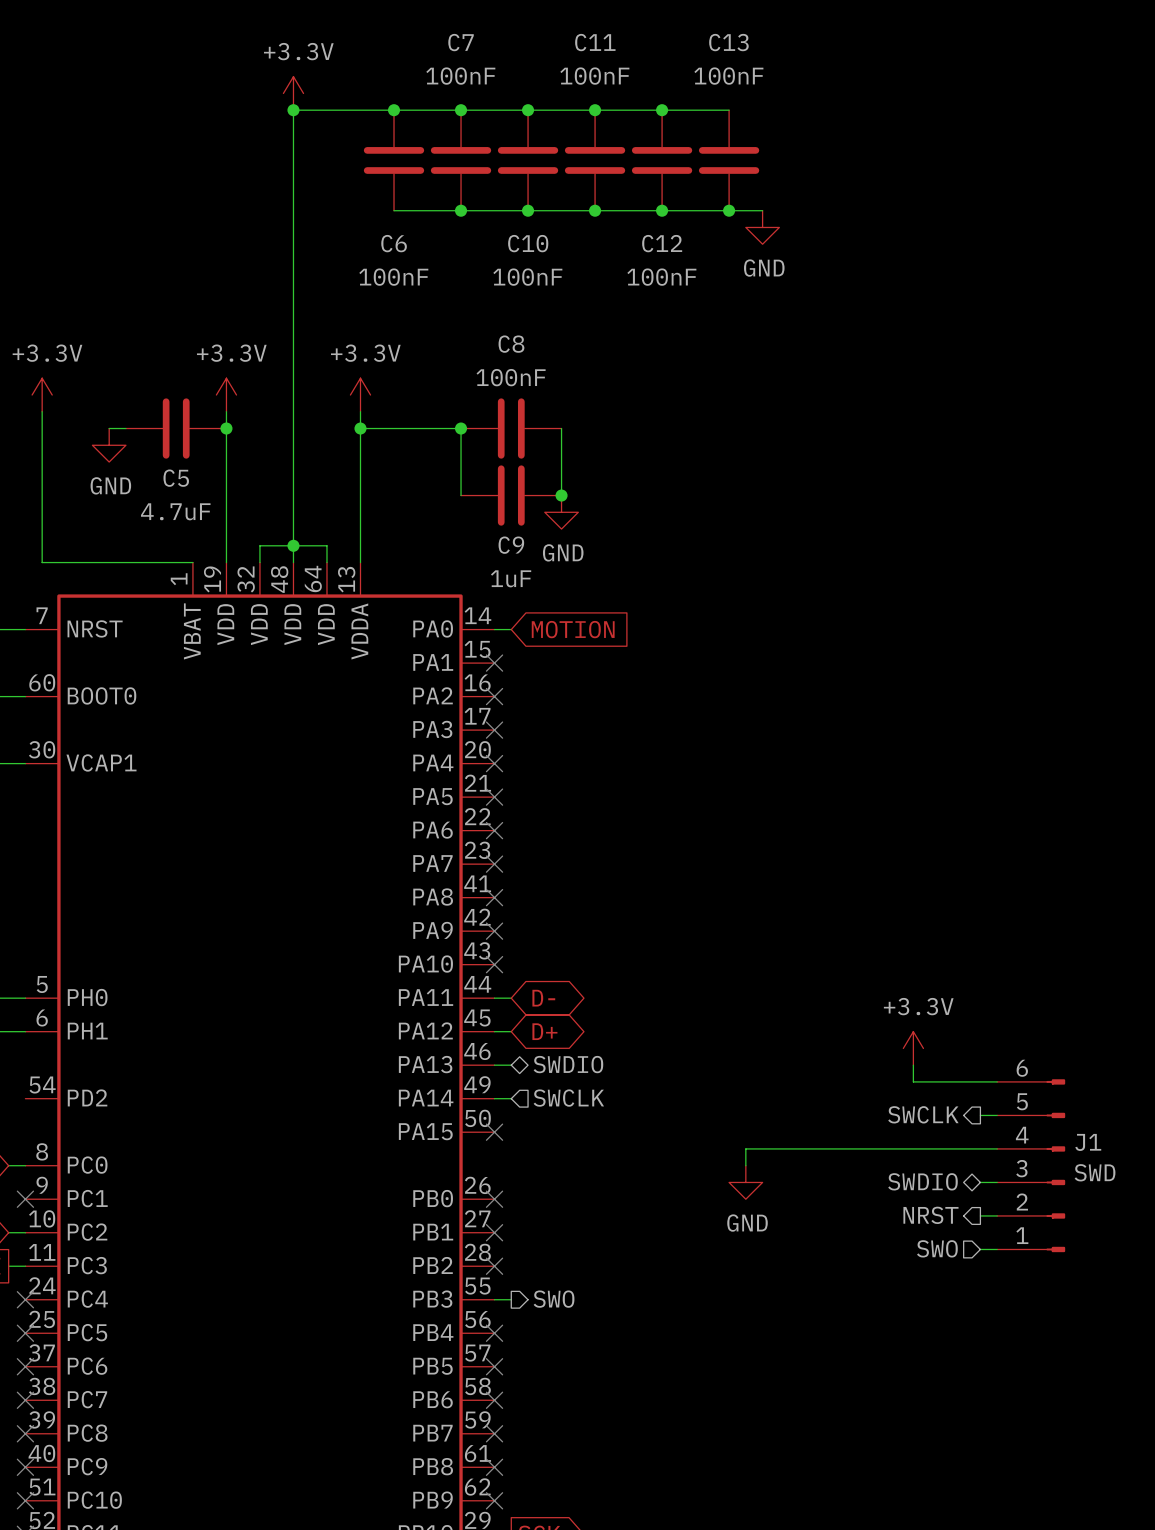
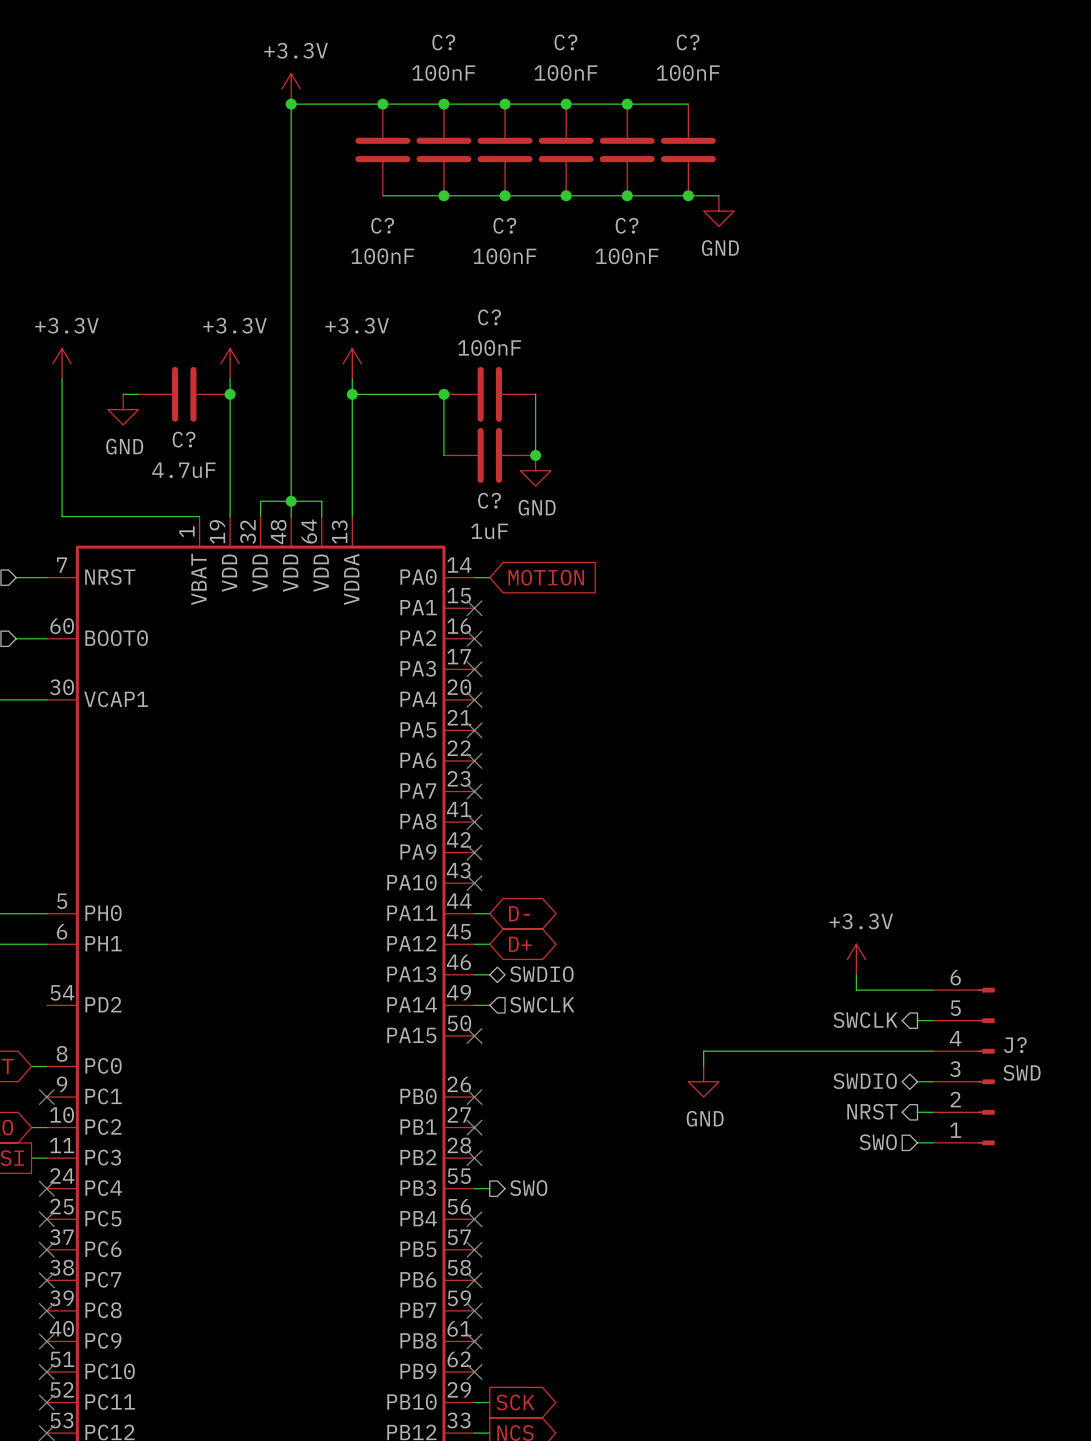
C7 name: C7 (461, 42) -> C? (443, 42)
C11 name: C11 (595, 42) -> C? (565, 42)
C13 name: C13 (728, 42) -> C? (688, 42)
C6 name: C6 (394, 243) -> C? (382, 225)
C10 name: C10 (528, 243) -> C? (504, 225)
C12 name: C12 (662, 243) -> C? (627, 225)
C8 name: C8 (511, 344) -> C? (489, 317)
C5 name: C5 (176, 478) -> C? (184, 439)
C9 name: C9 (511, 545) -> C? (489, 500)
J1 name: J1 (1088, 1142) -> J? (1015, 1045)

